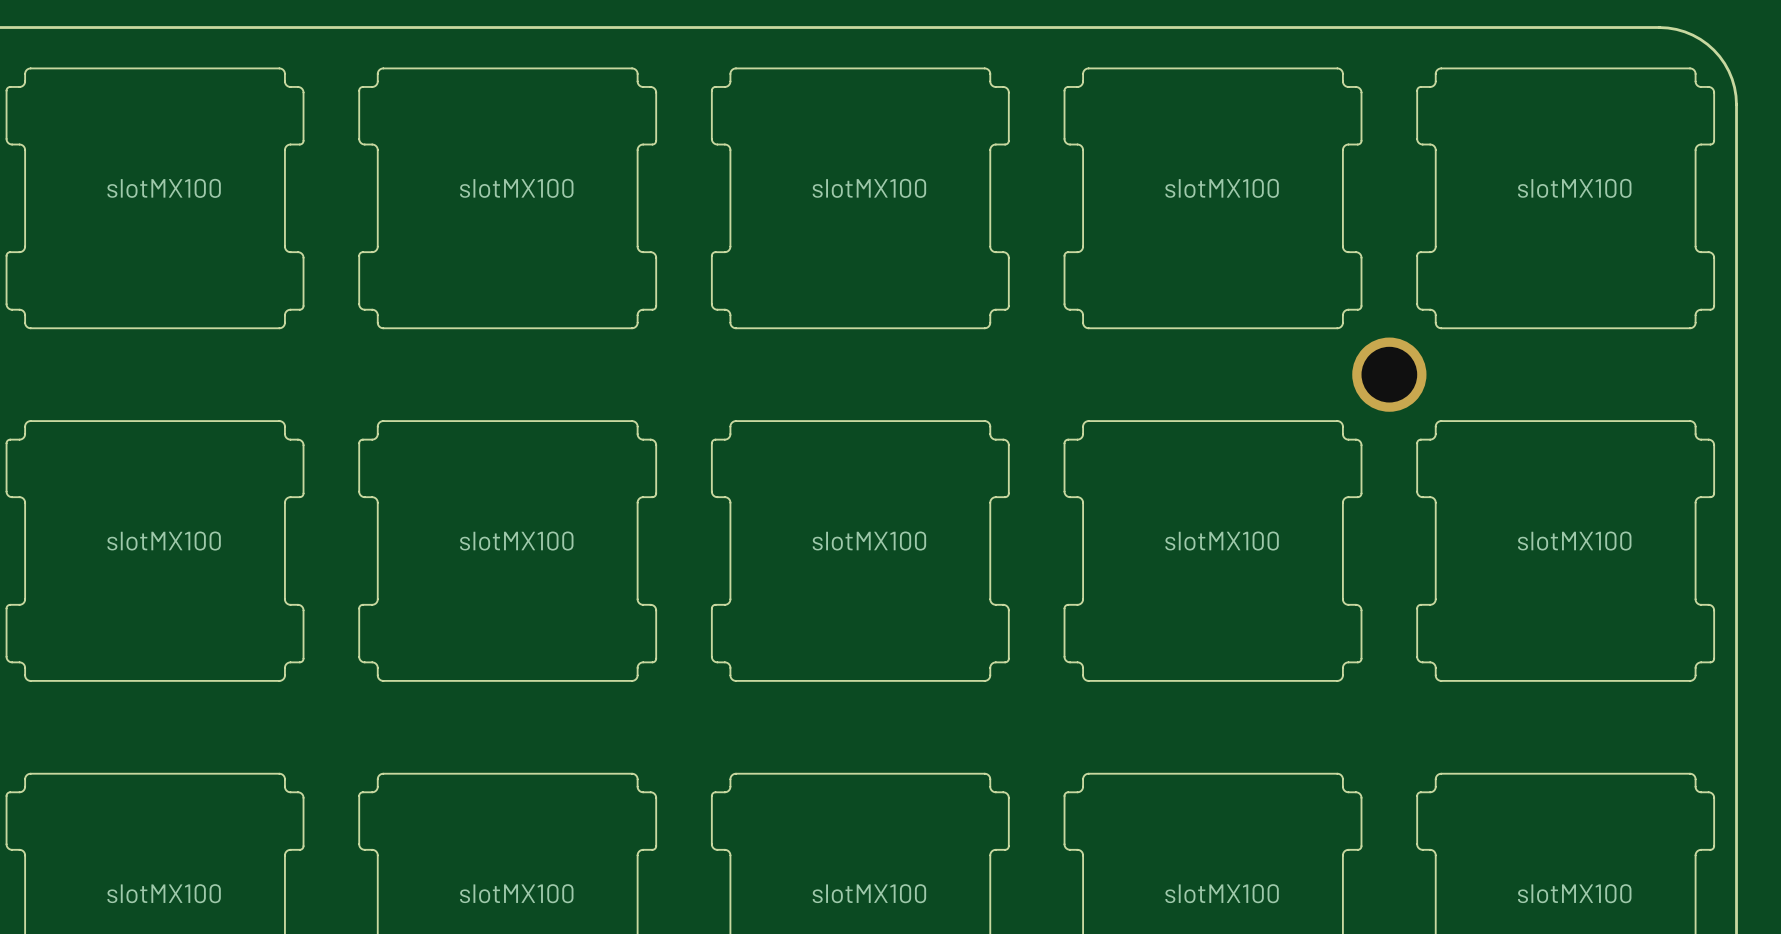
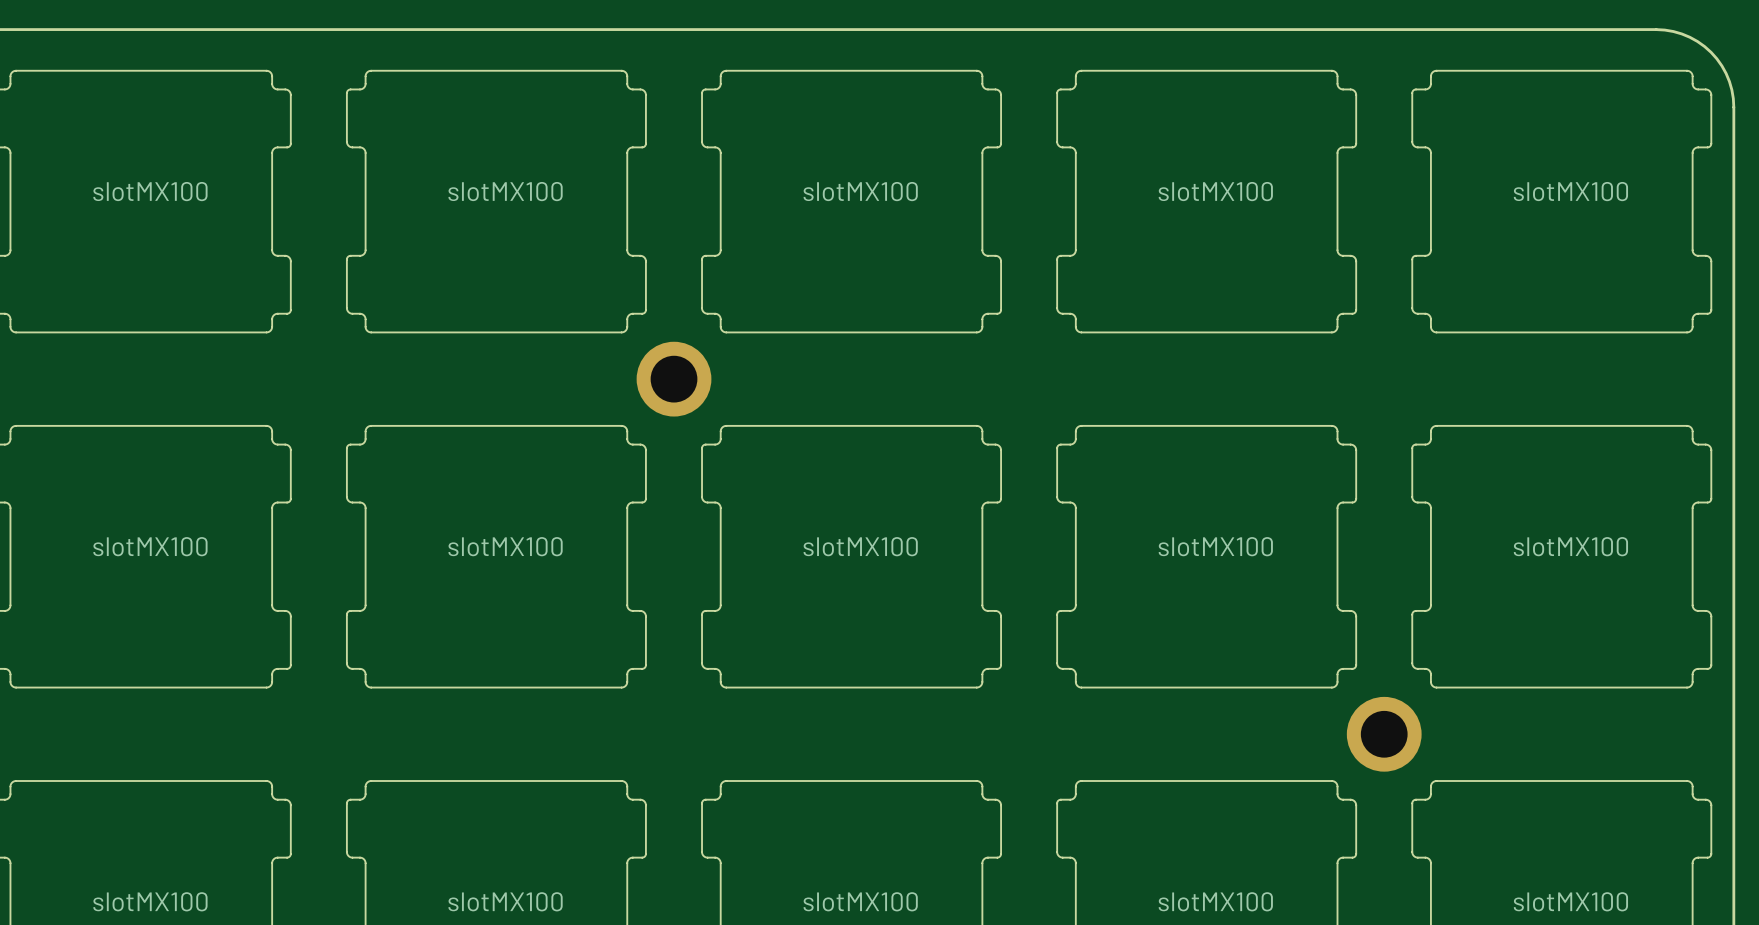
via: none -> (674, 379)
via: (1389, 374) -> none
via: none -> (1384, 734)

